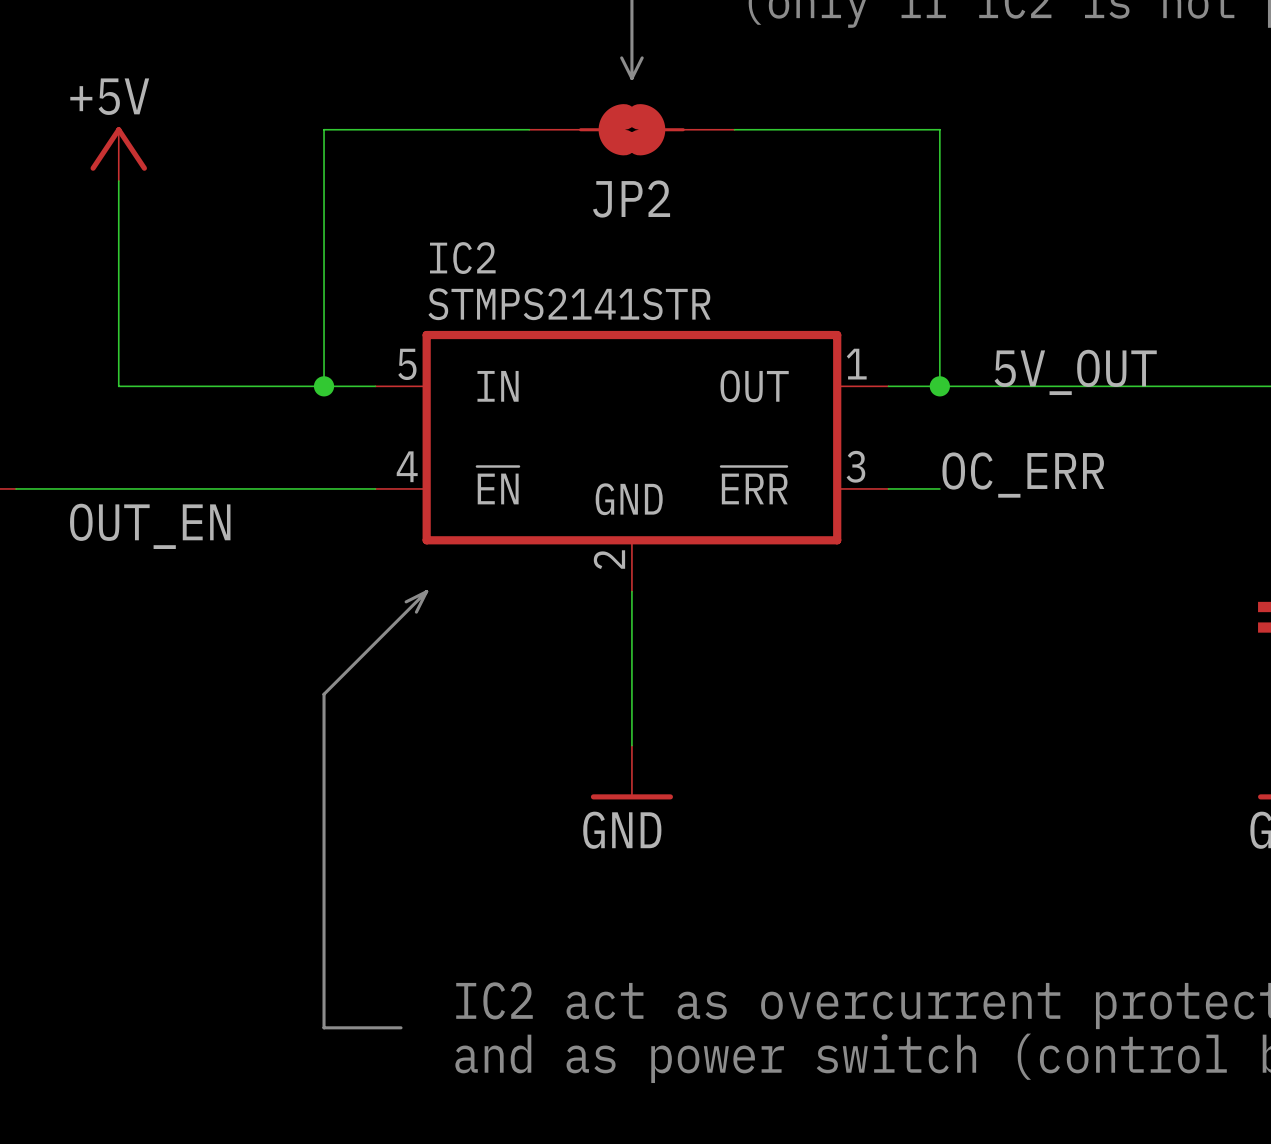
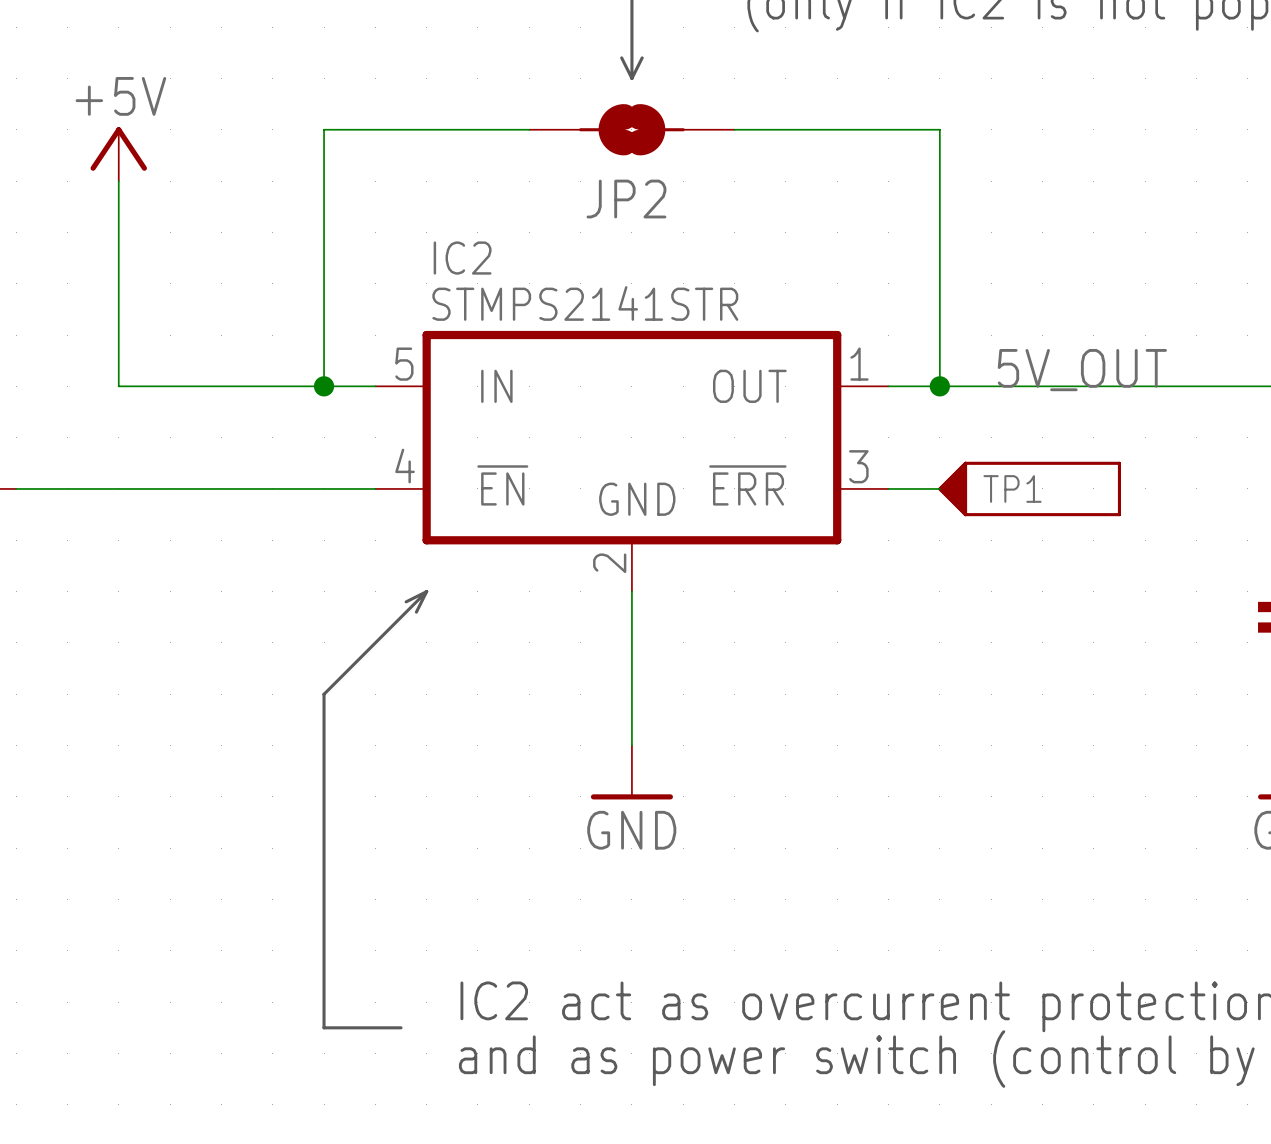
label: OC_ERR (1023, 475) -> none
TP1: none -> (1029, 488)
label: OUT_EN (150, 526) -> none

